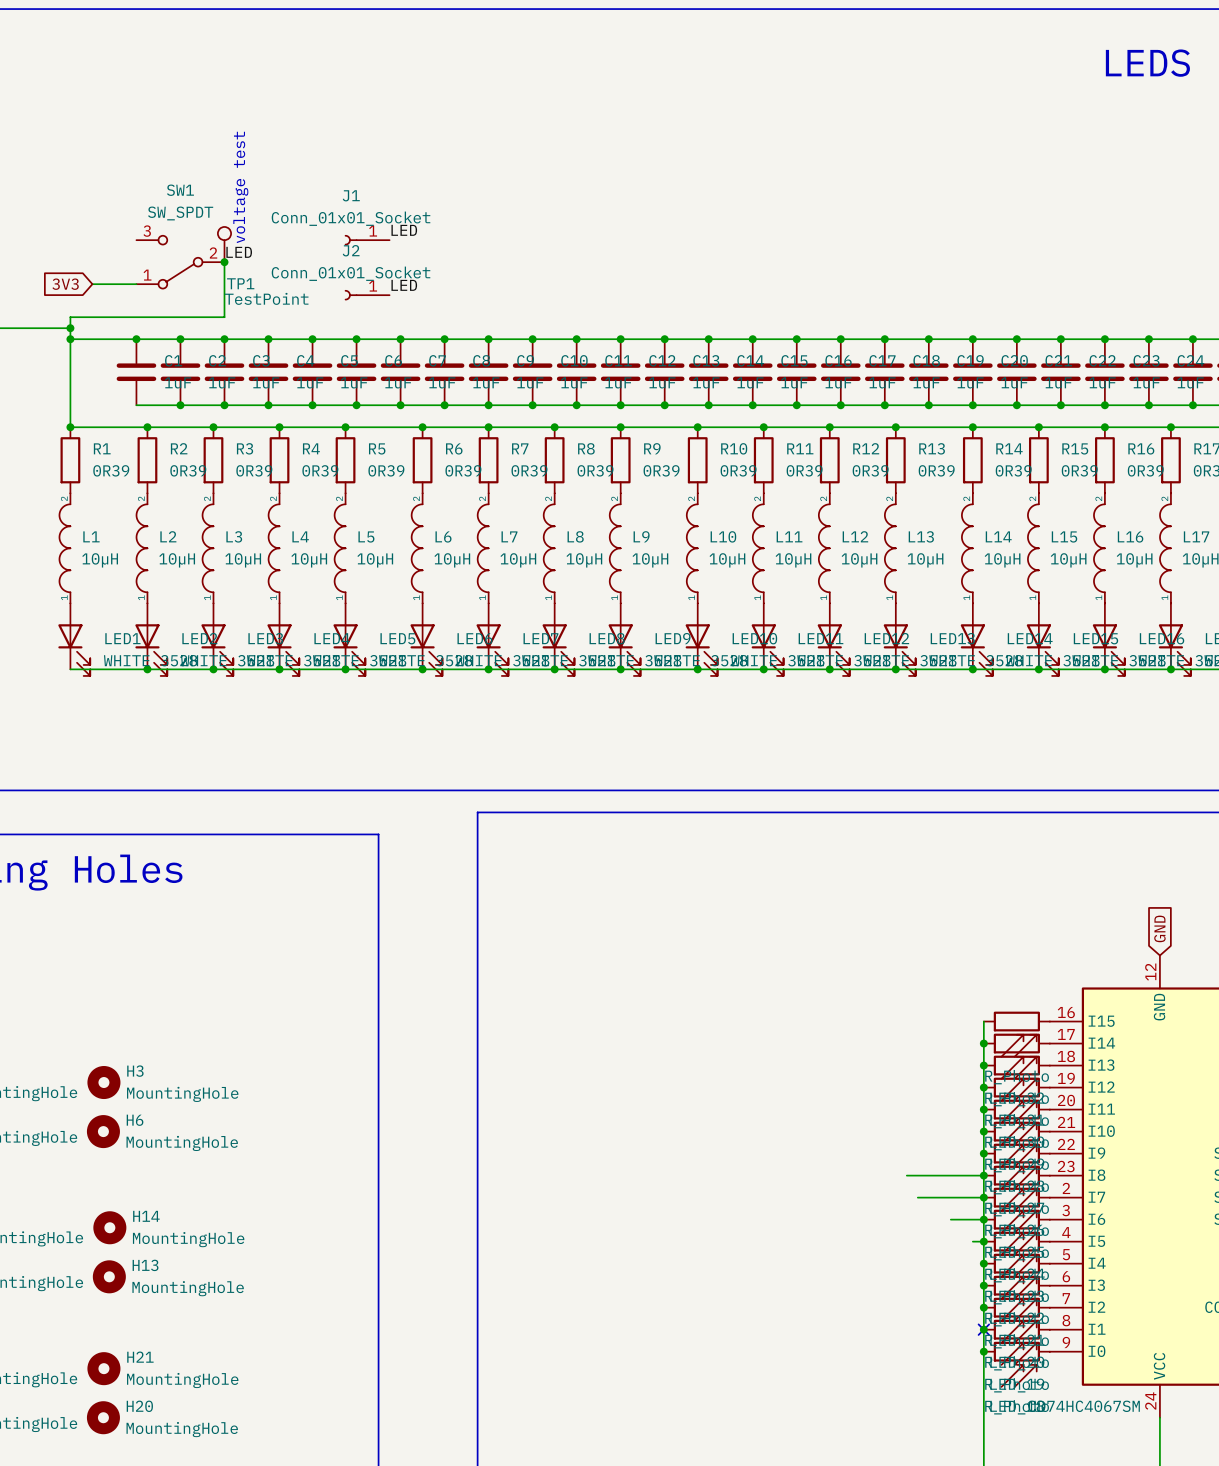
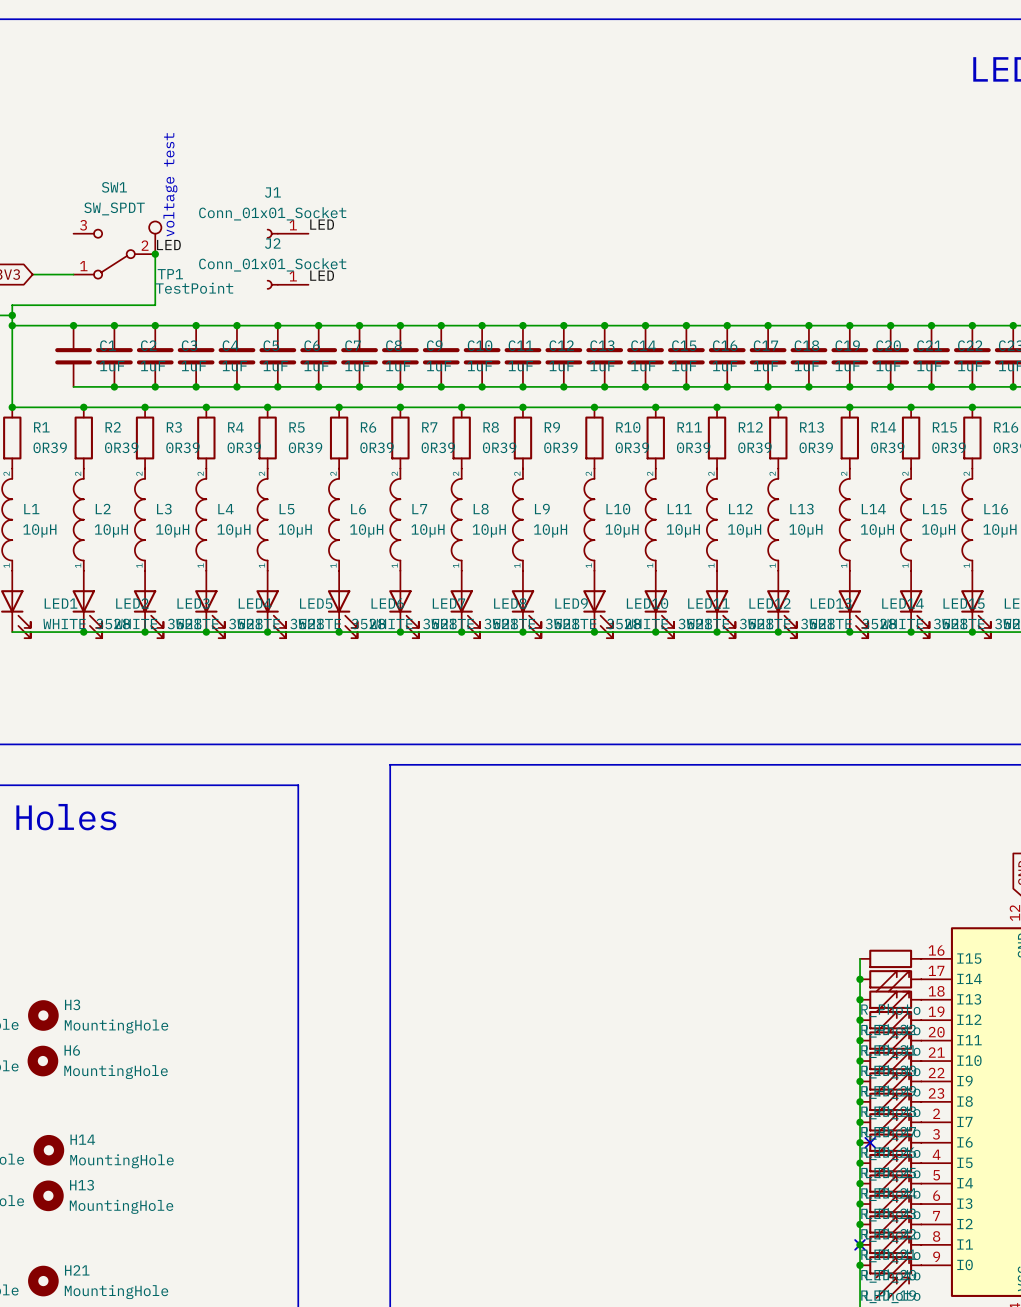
wire: (906, 1175) (983, 1175) -> none
wire: (917, 1197) (983, 1197) -> none
wire: (950, 1219) (983, 1219) -> none
no-connect mark: none -> (870, 1142)
wire: (972, 1241) (983, 1241) -> none

